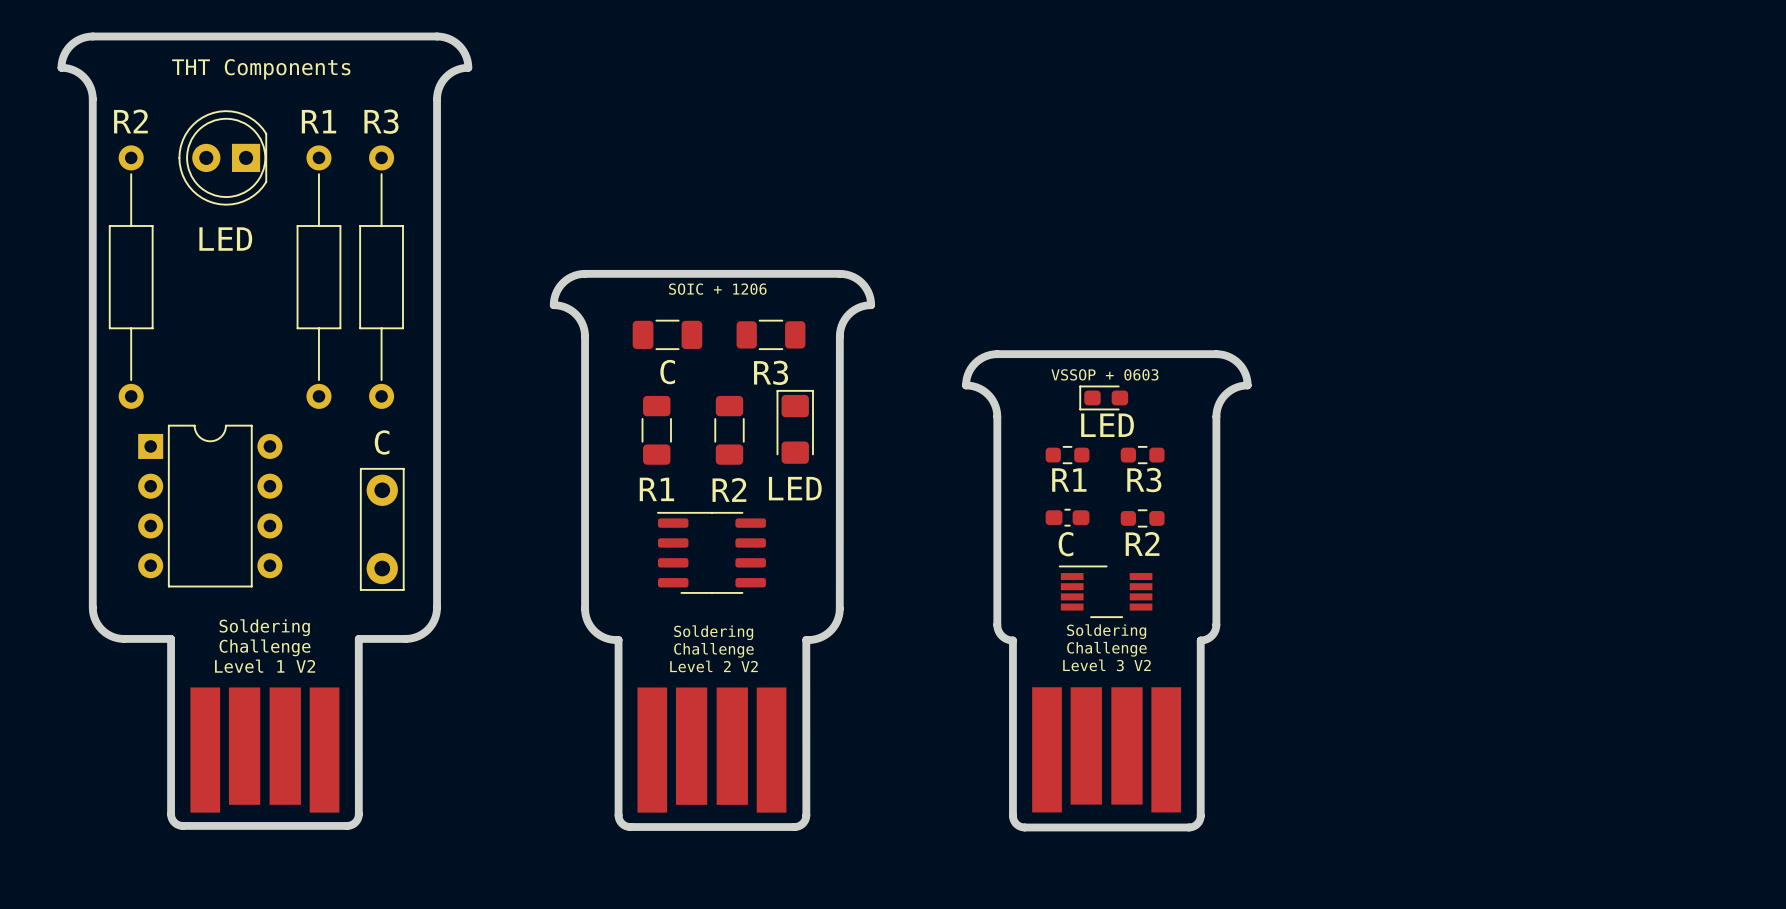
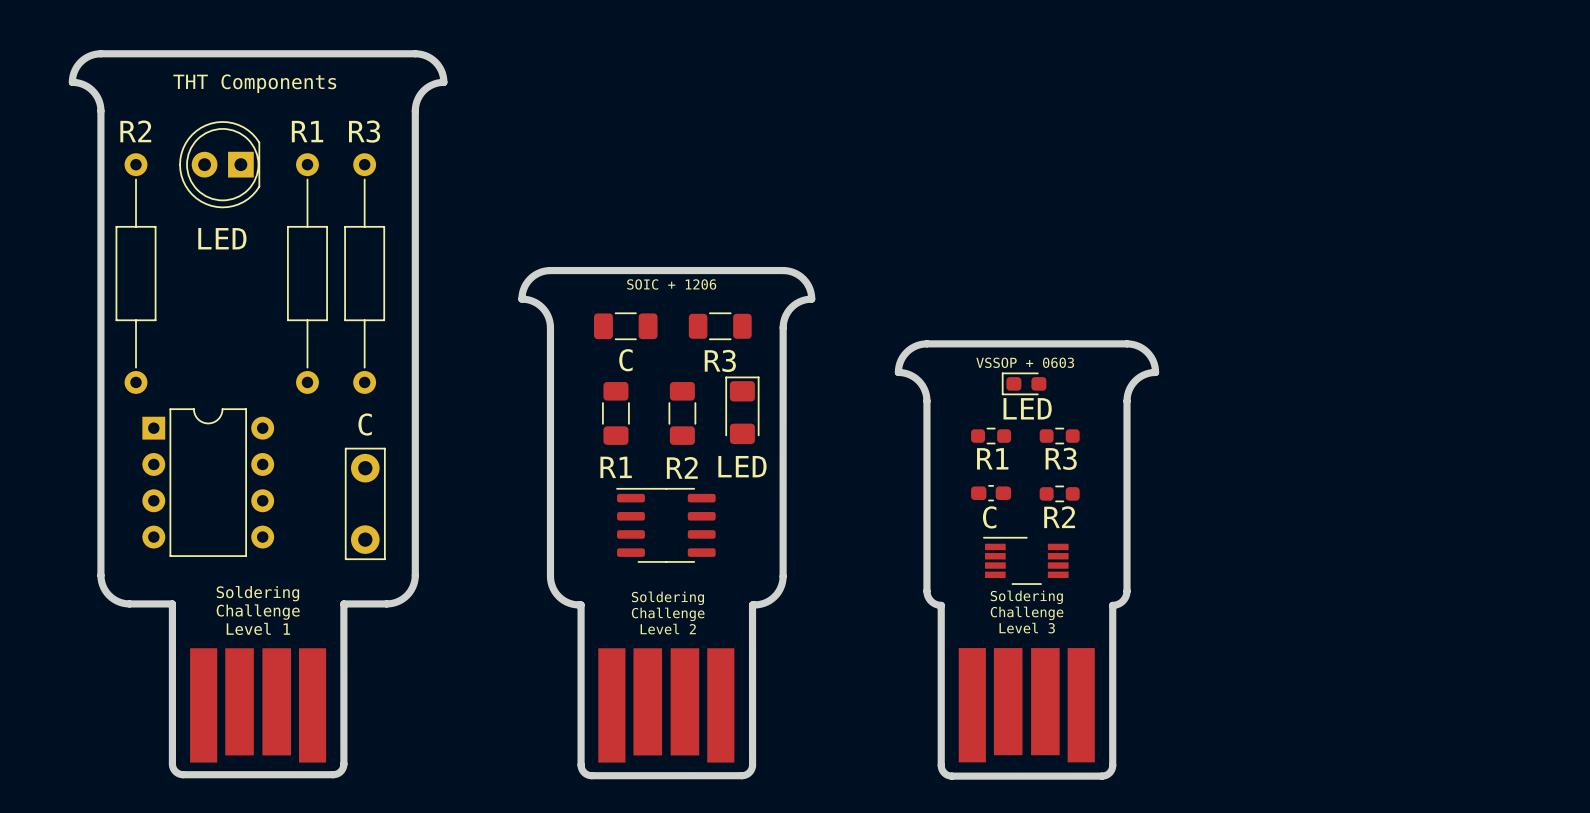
text: Level 3 V2 (1106, 665) -> Level 3 (1027, 628)
text: Level 1 V2 (265, 666) -> Level 1 (258, 628)
text: Level 2 V2 (714, 666) -> Level 2 (668, 629)

